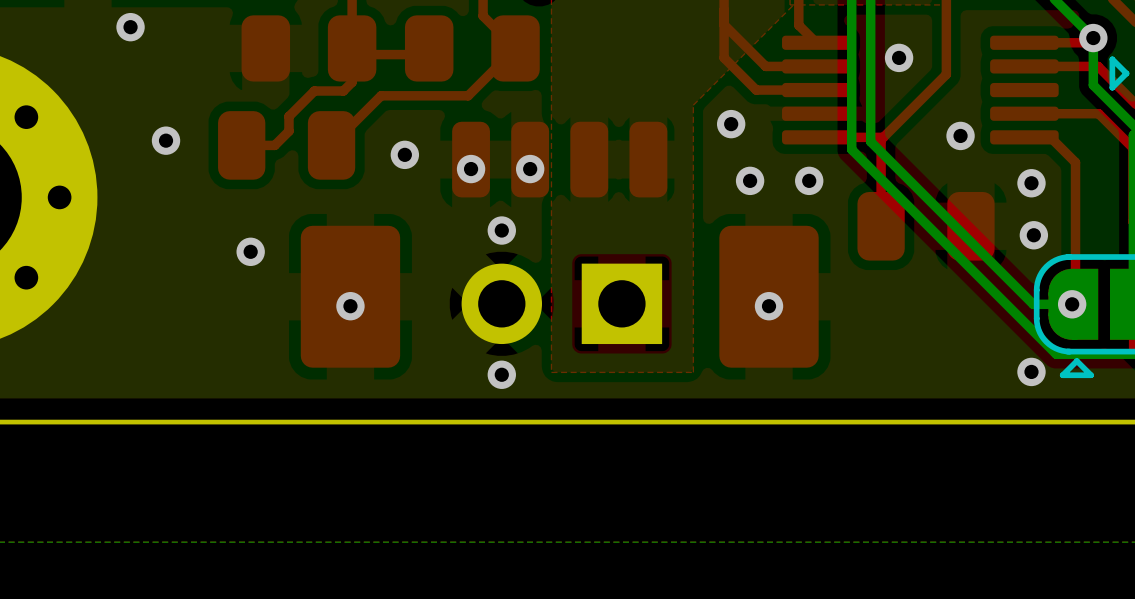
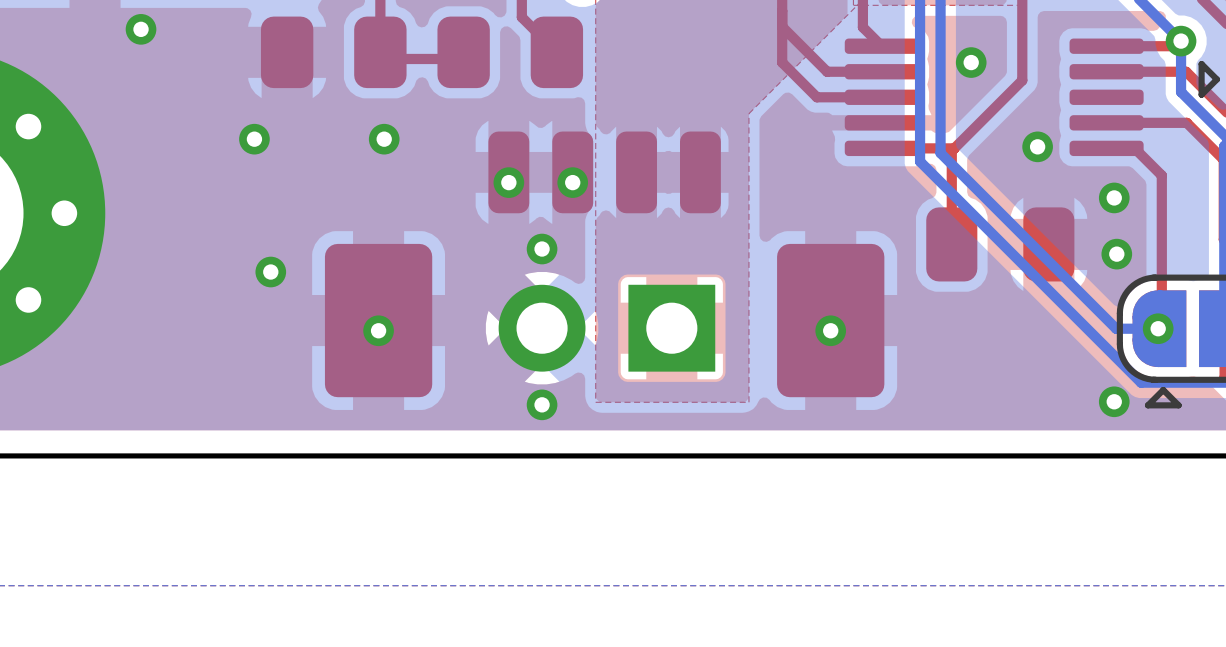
top track: (352, 48) (352, 82) (343, 91) (314, 91) (288, 116) (288, 131) (274, 145) (241, 145) -> none
top track: (515, 48) (468, 95) (381, 95) (331, 145) -> none
via: (731, 124) -> none
via position: (166, 140) -> (254, 139)
part: (286, 145) -> none
via position: (404, 154) -> (384, 139)
via: (750, 180) -> none
via: (809, 180) -> none

